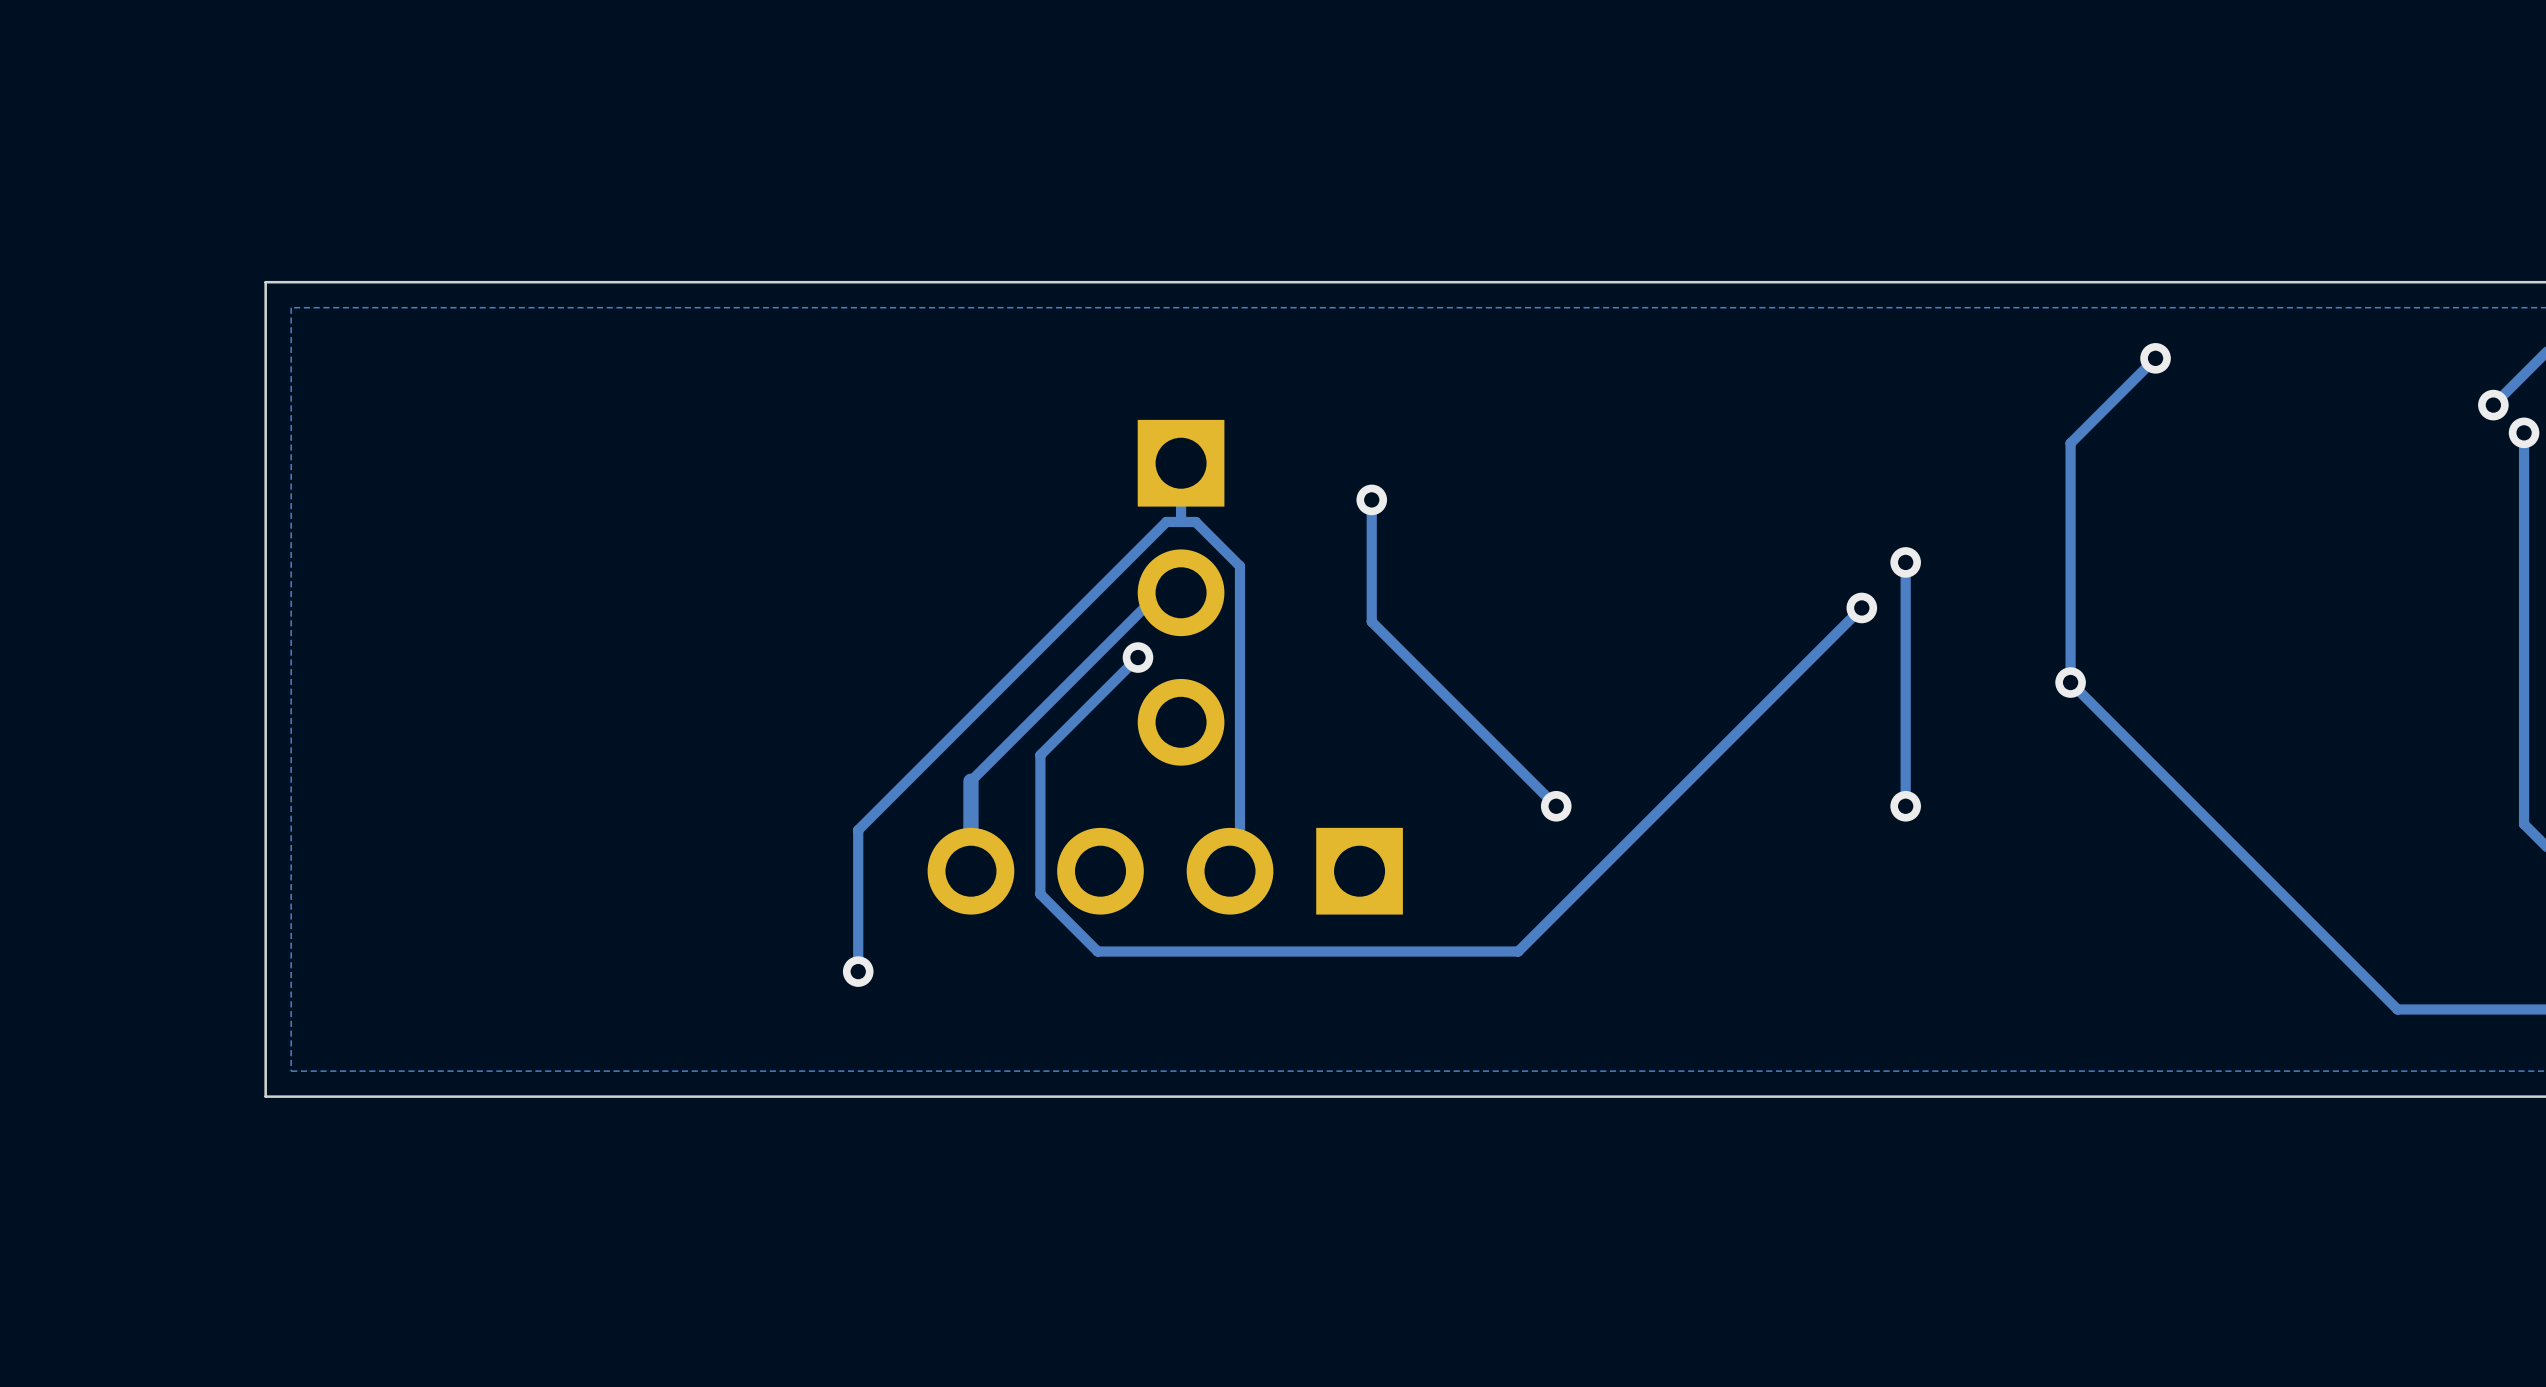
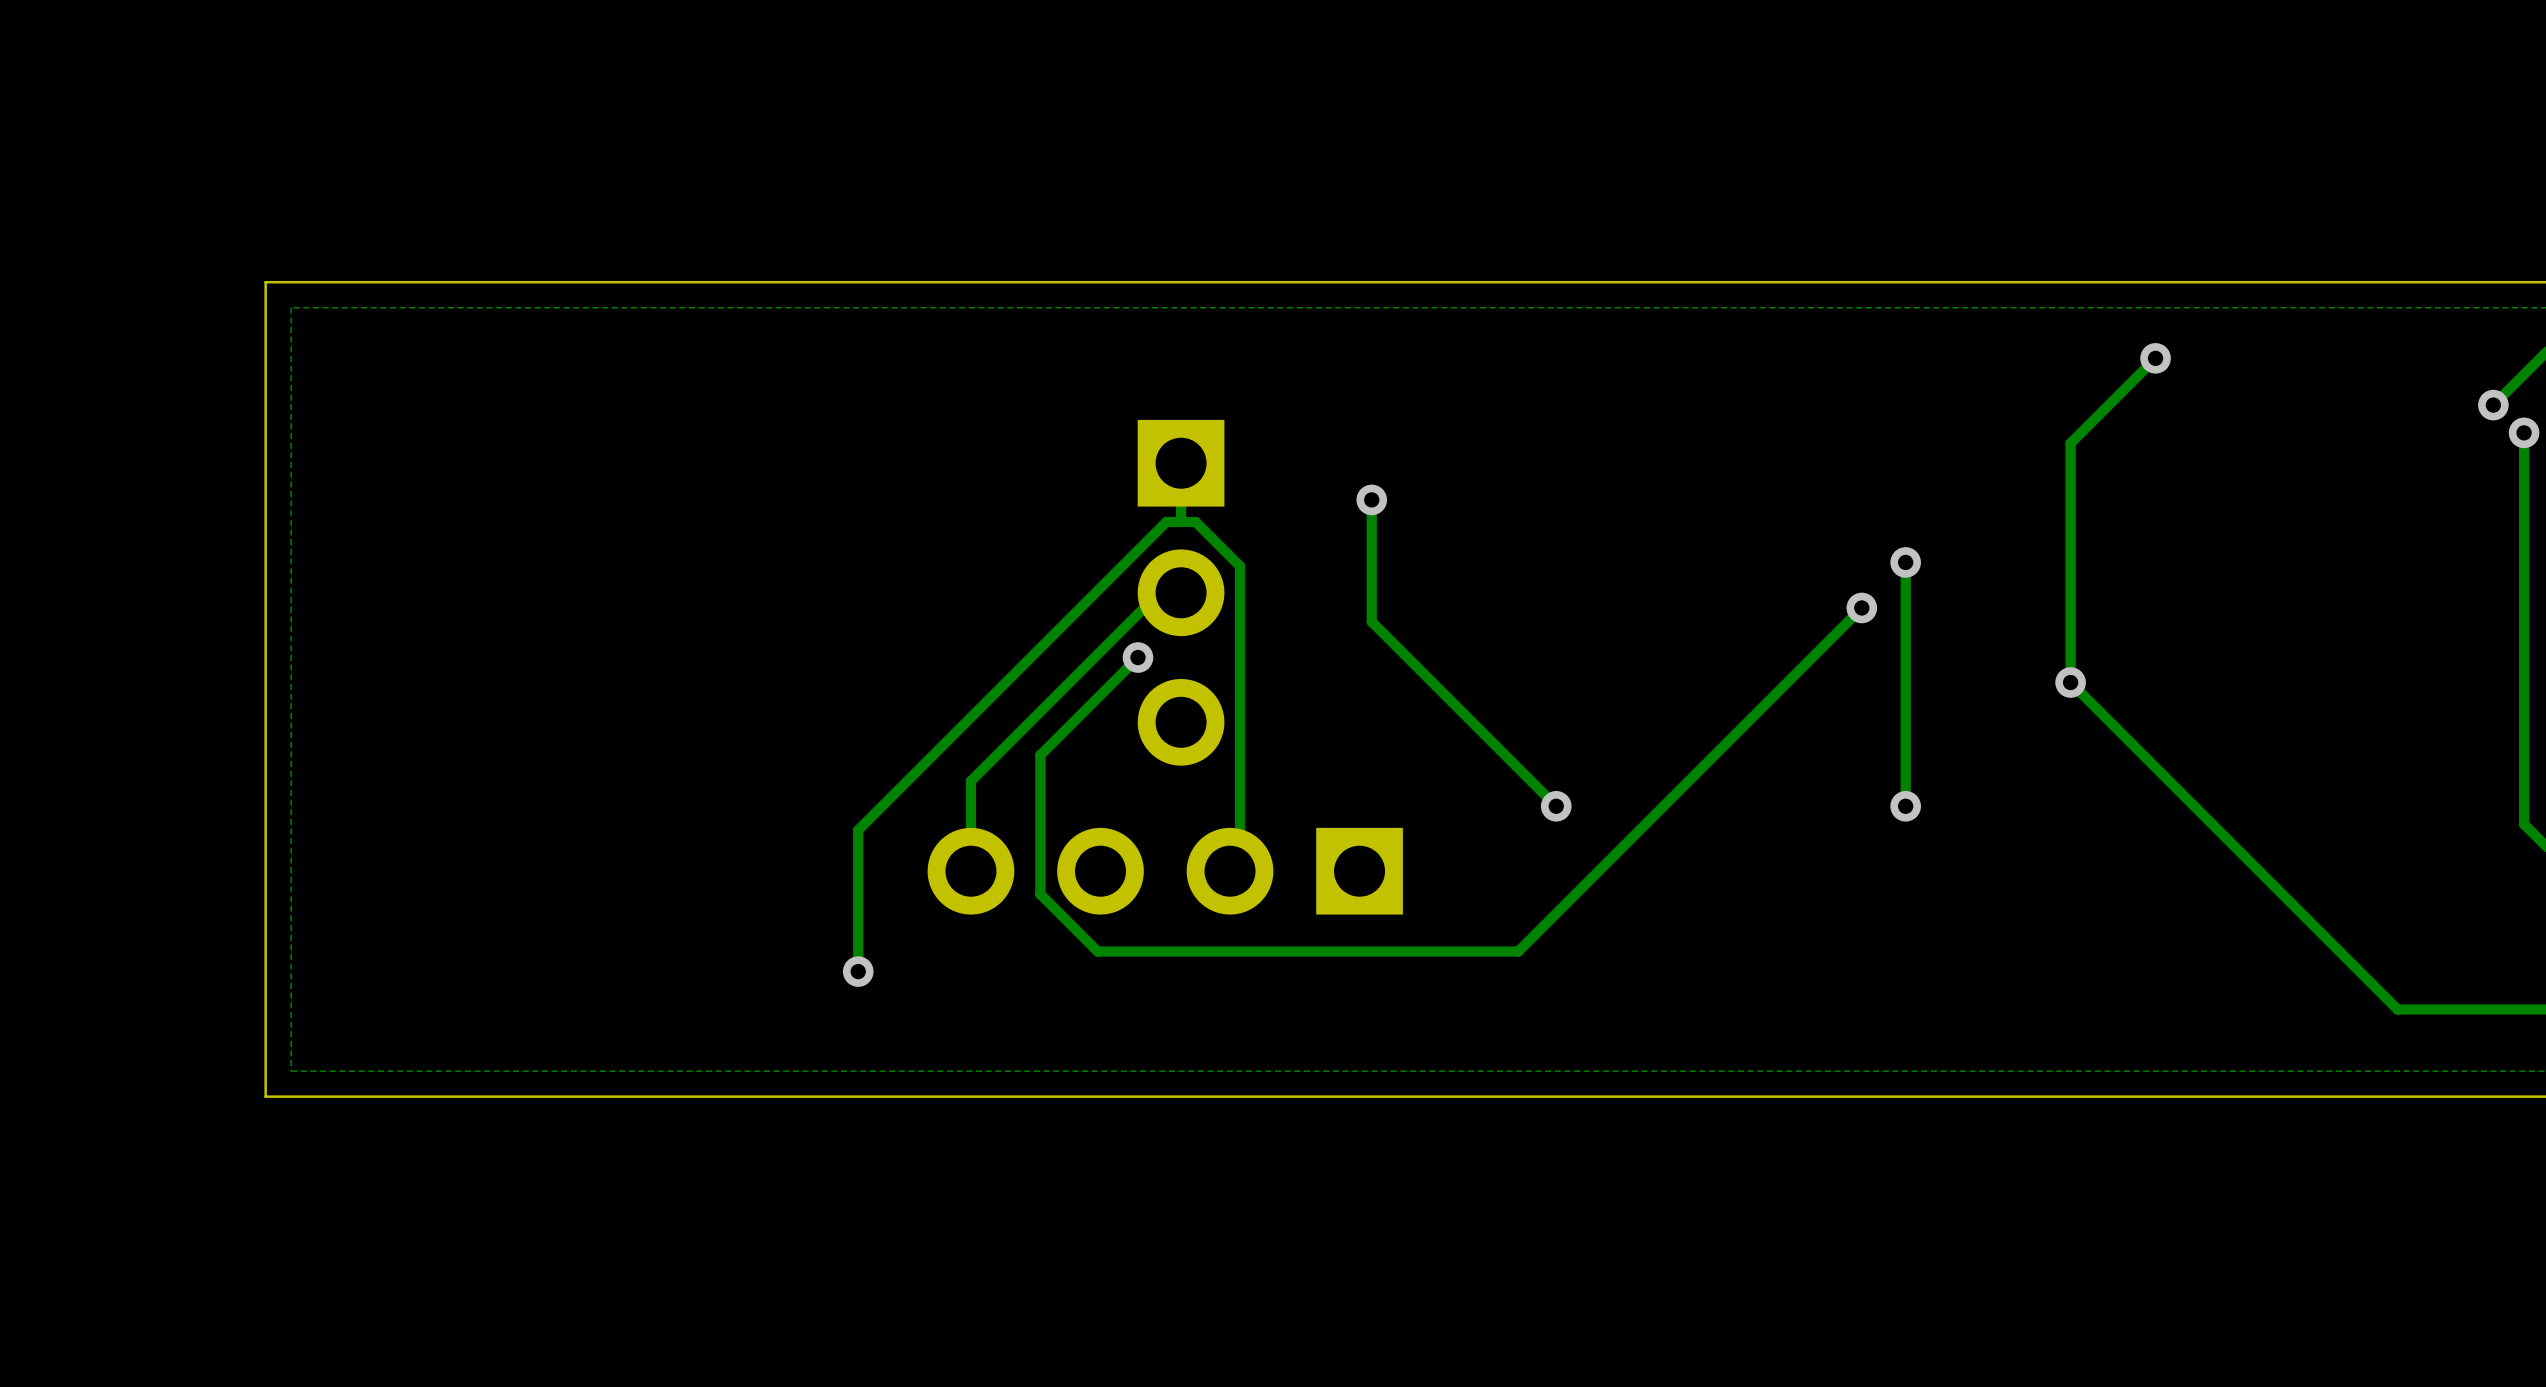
track width: thick (970, 781) (970, 871) -> thin (970, 781) (970, 871)

